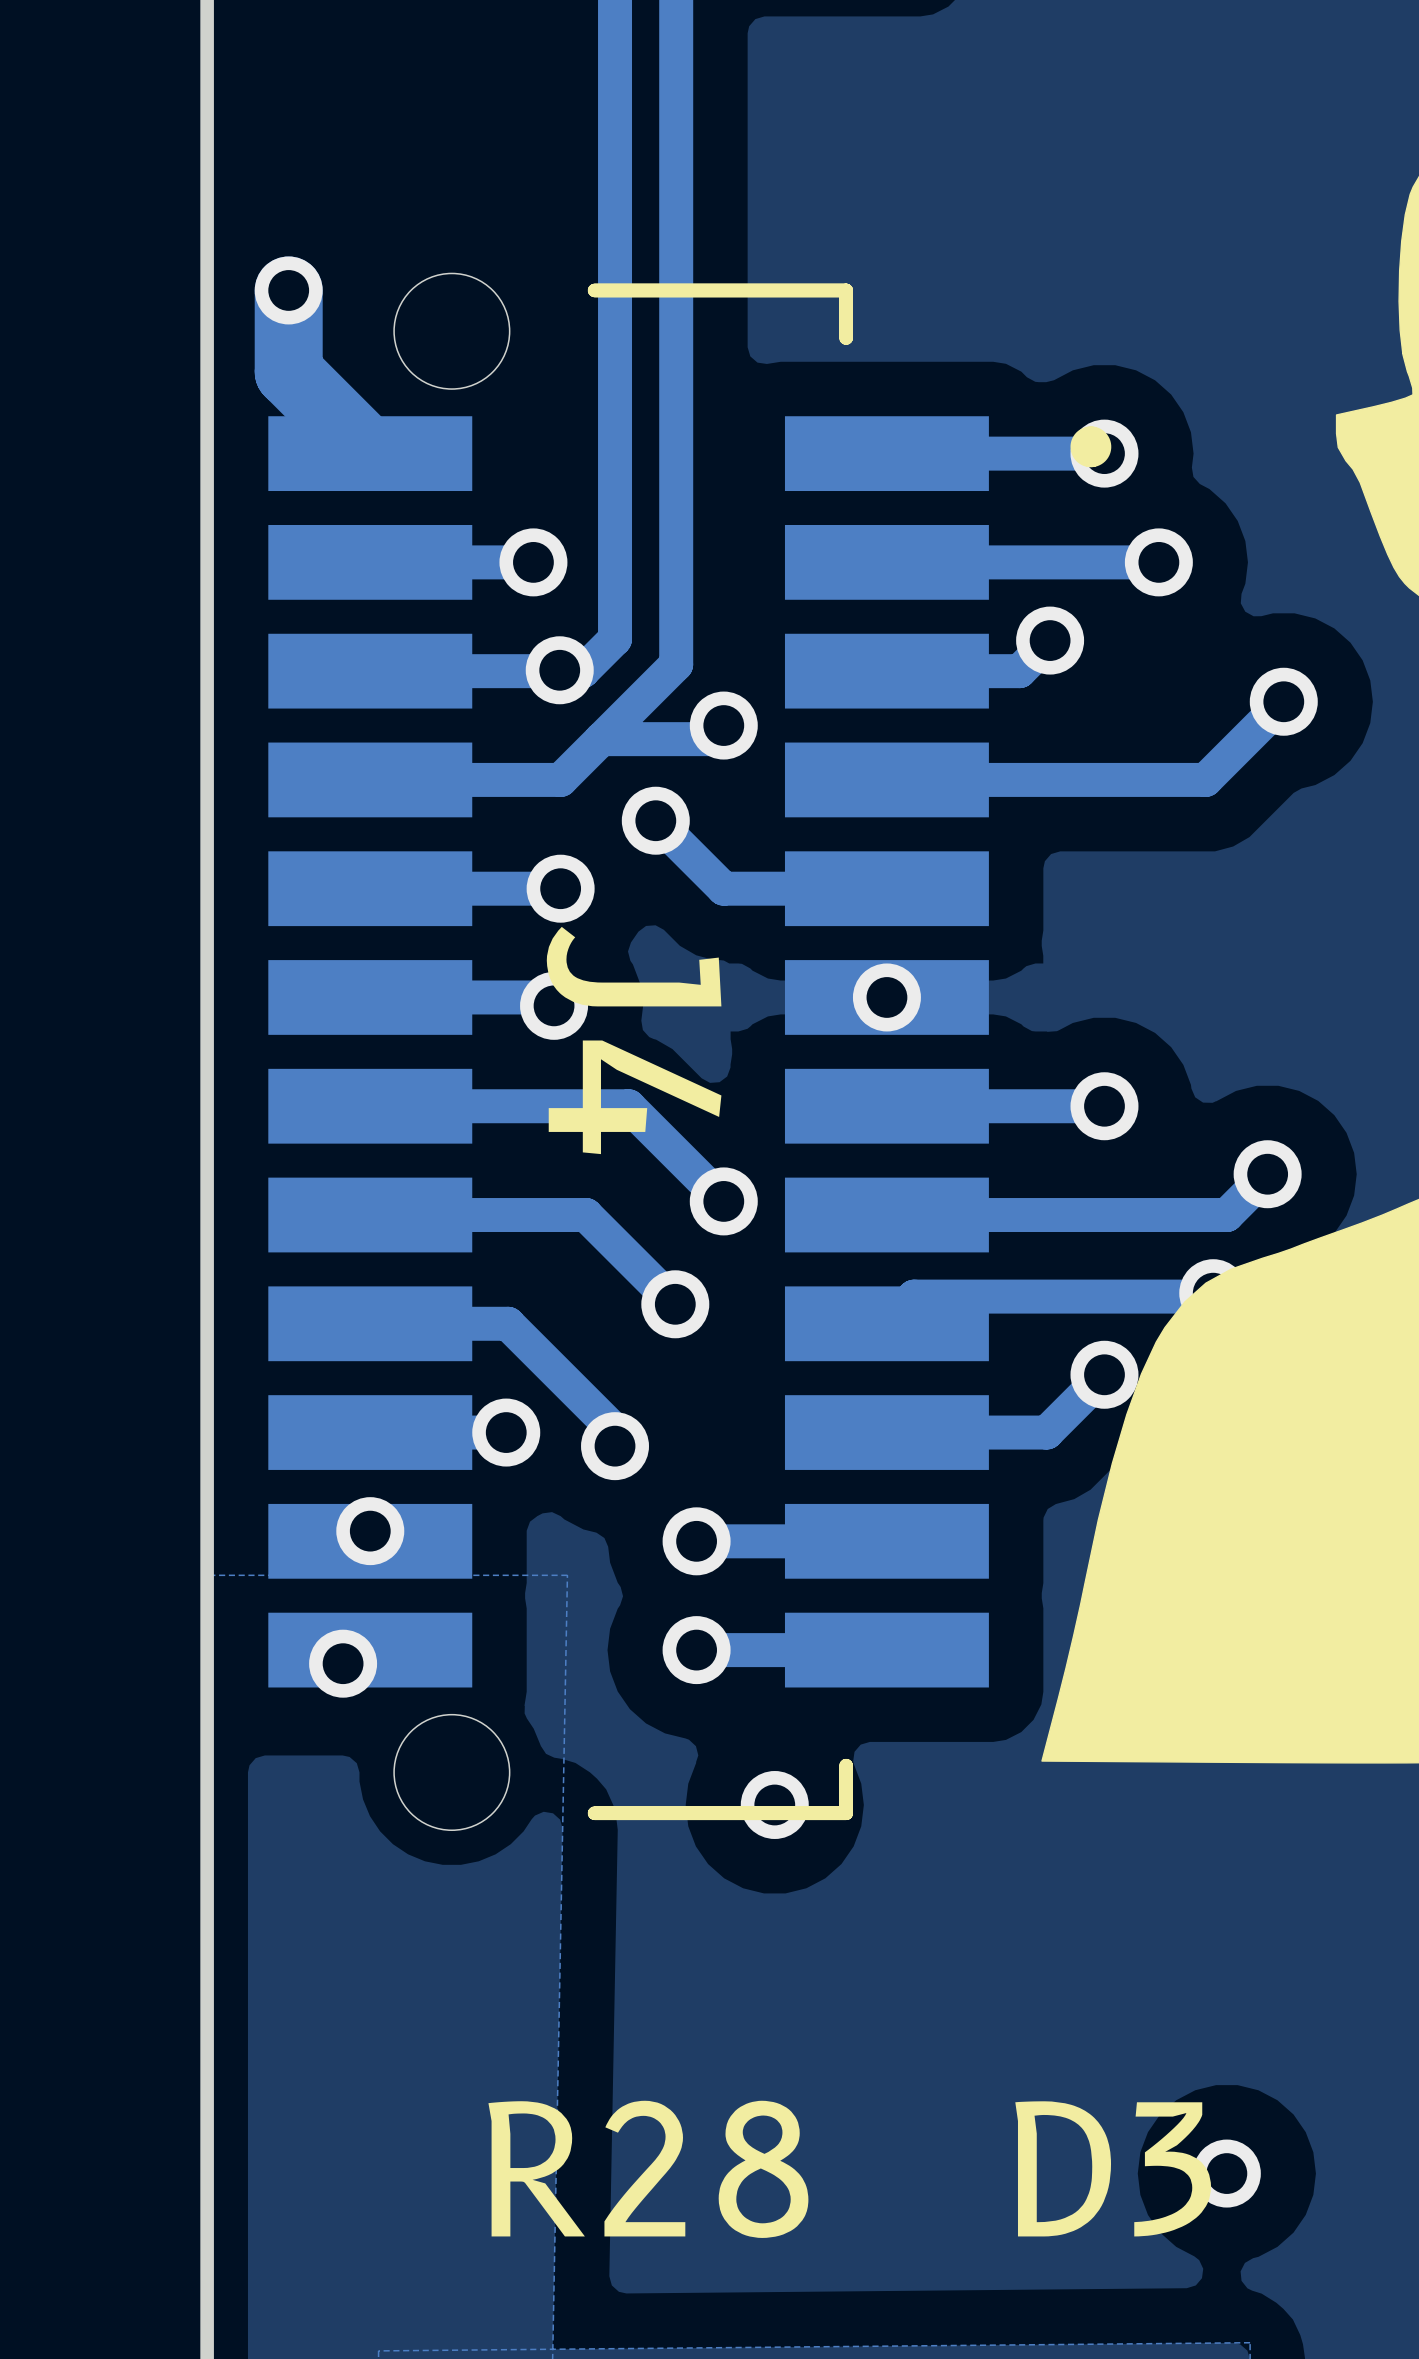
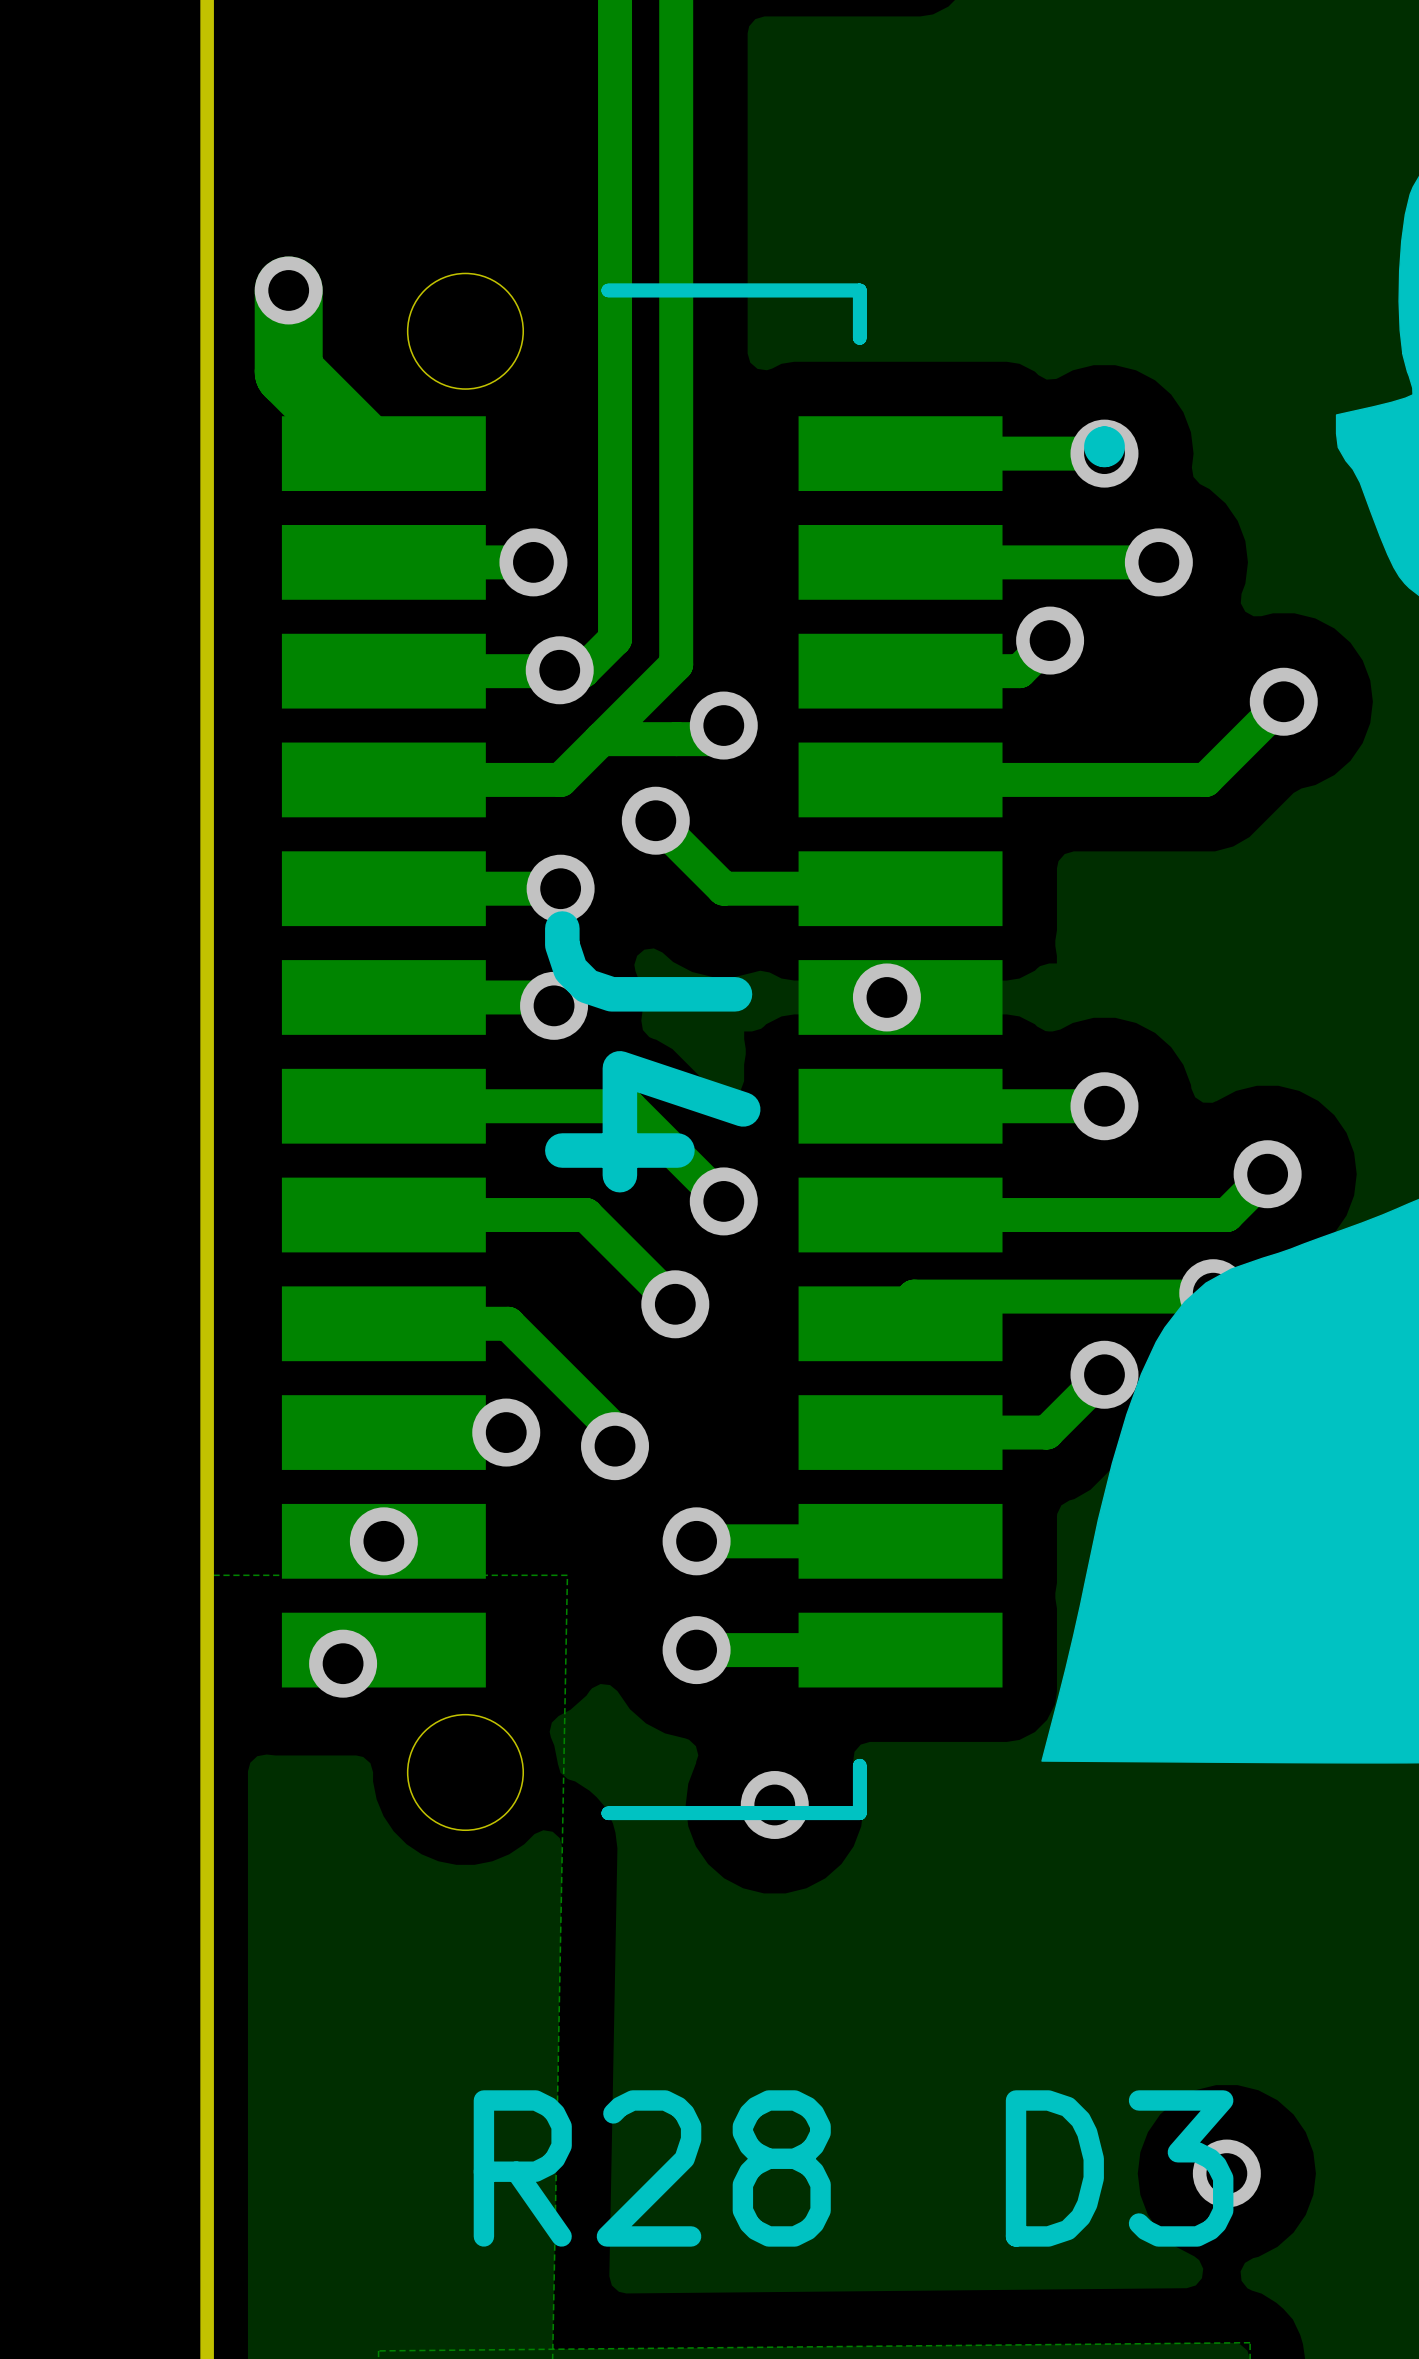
J4 position: (689, 1051) -> (703, 1051)
via position: (370, 1531) -> (383, 1541)

